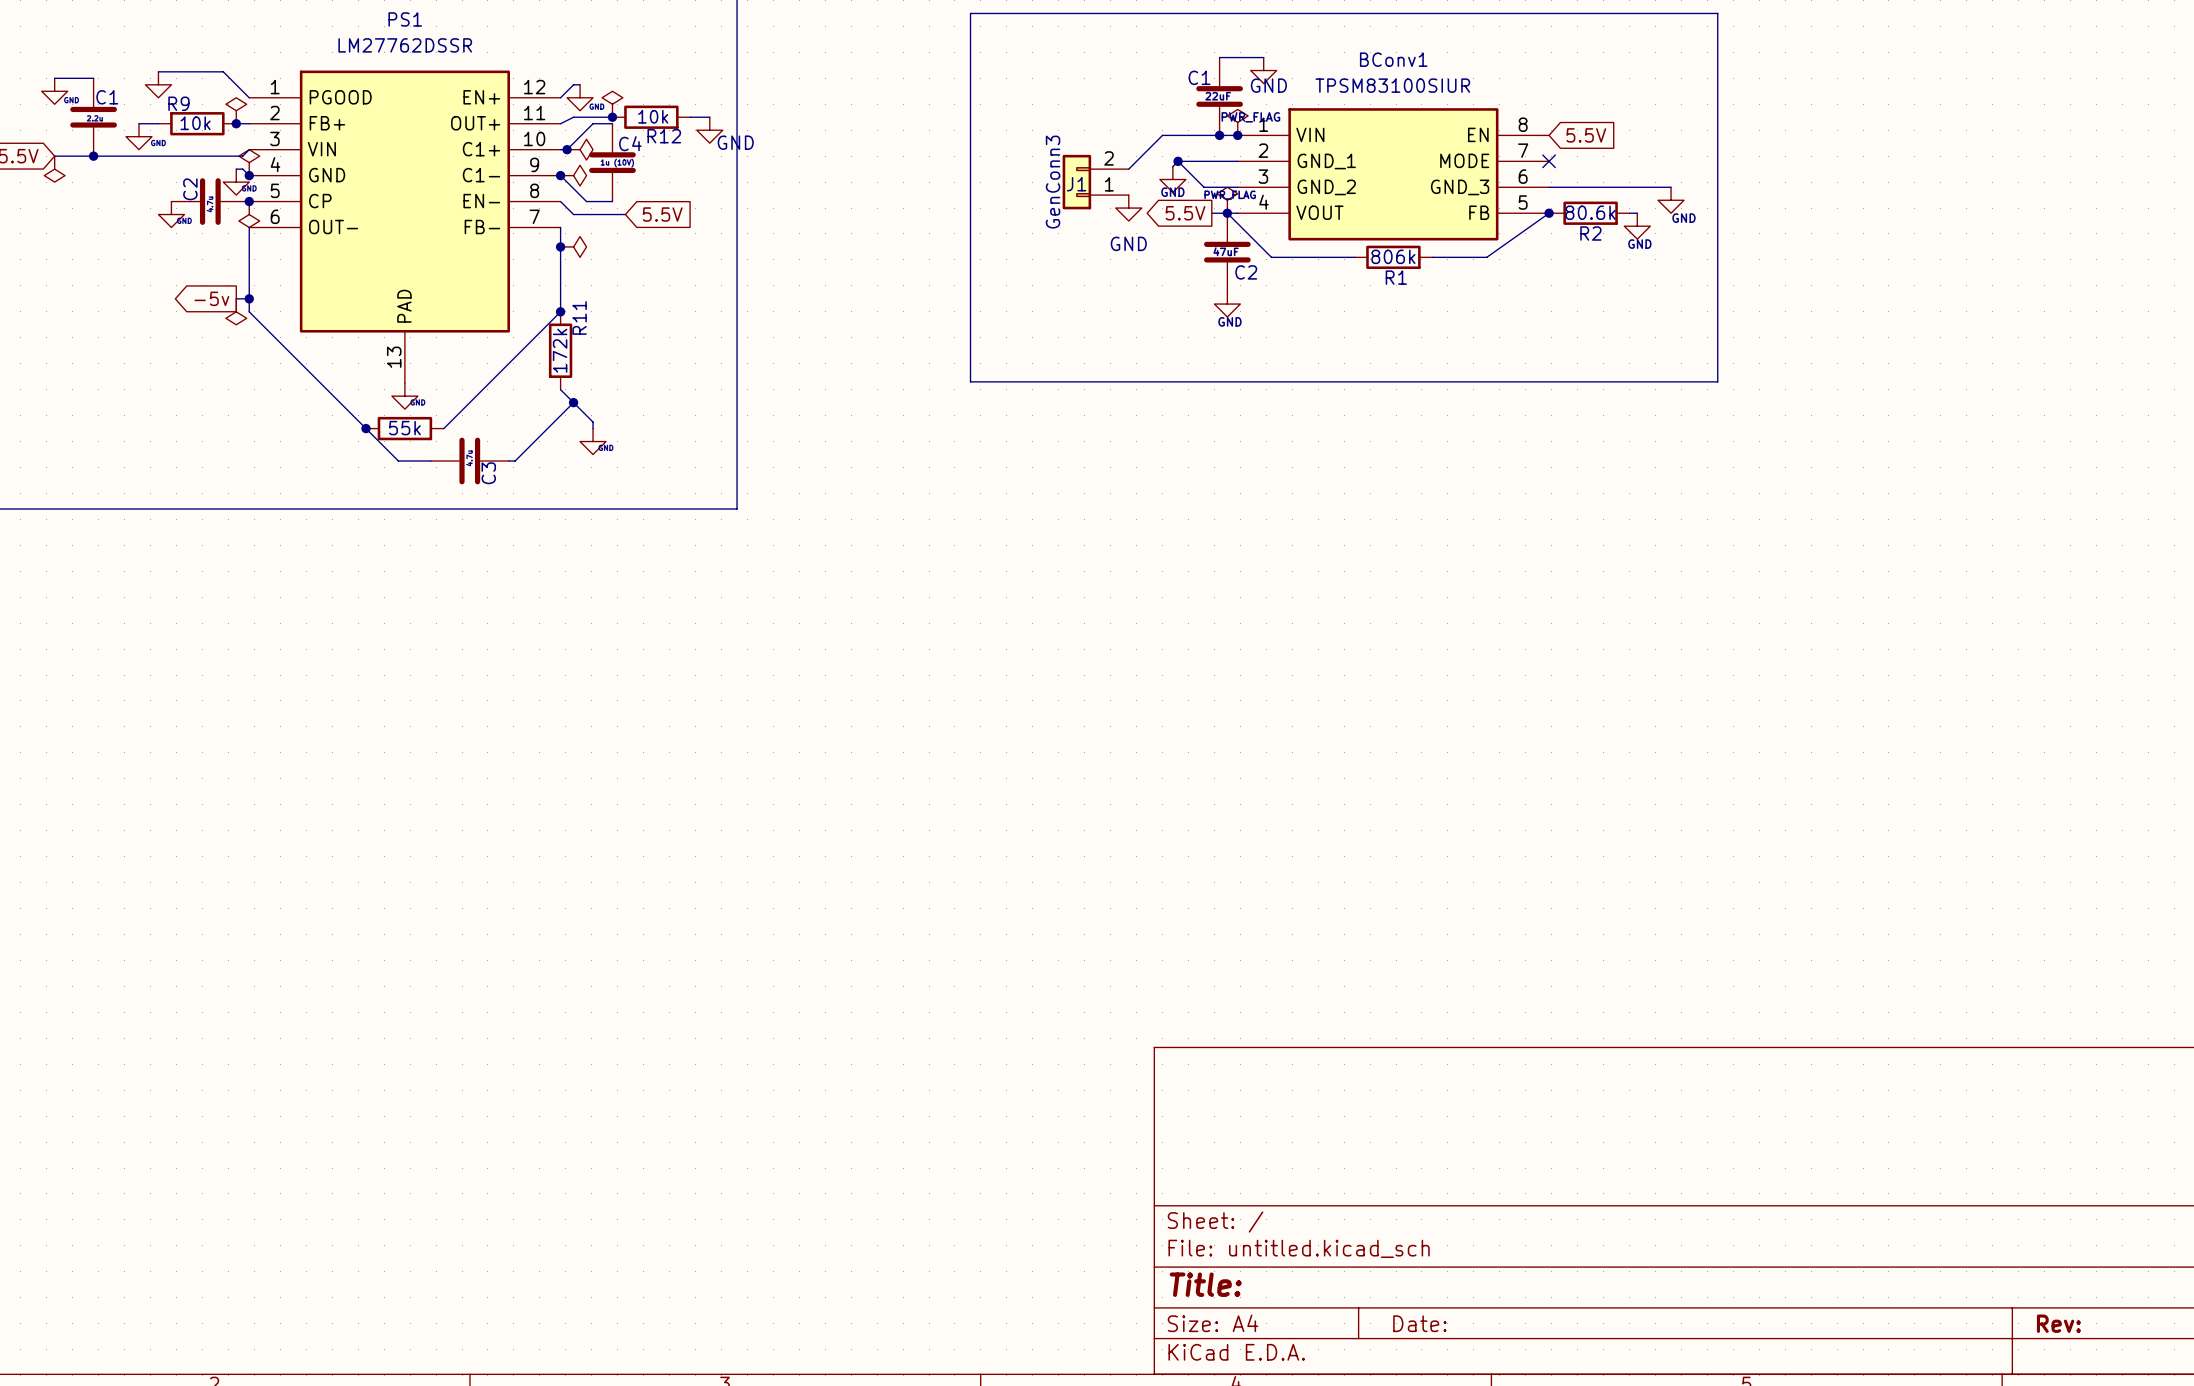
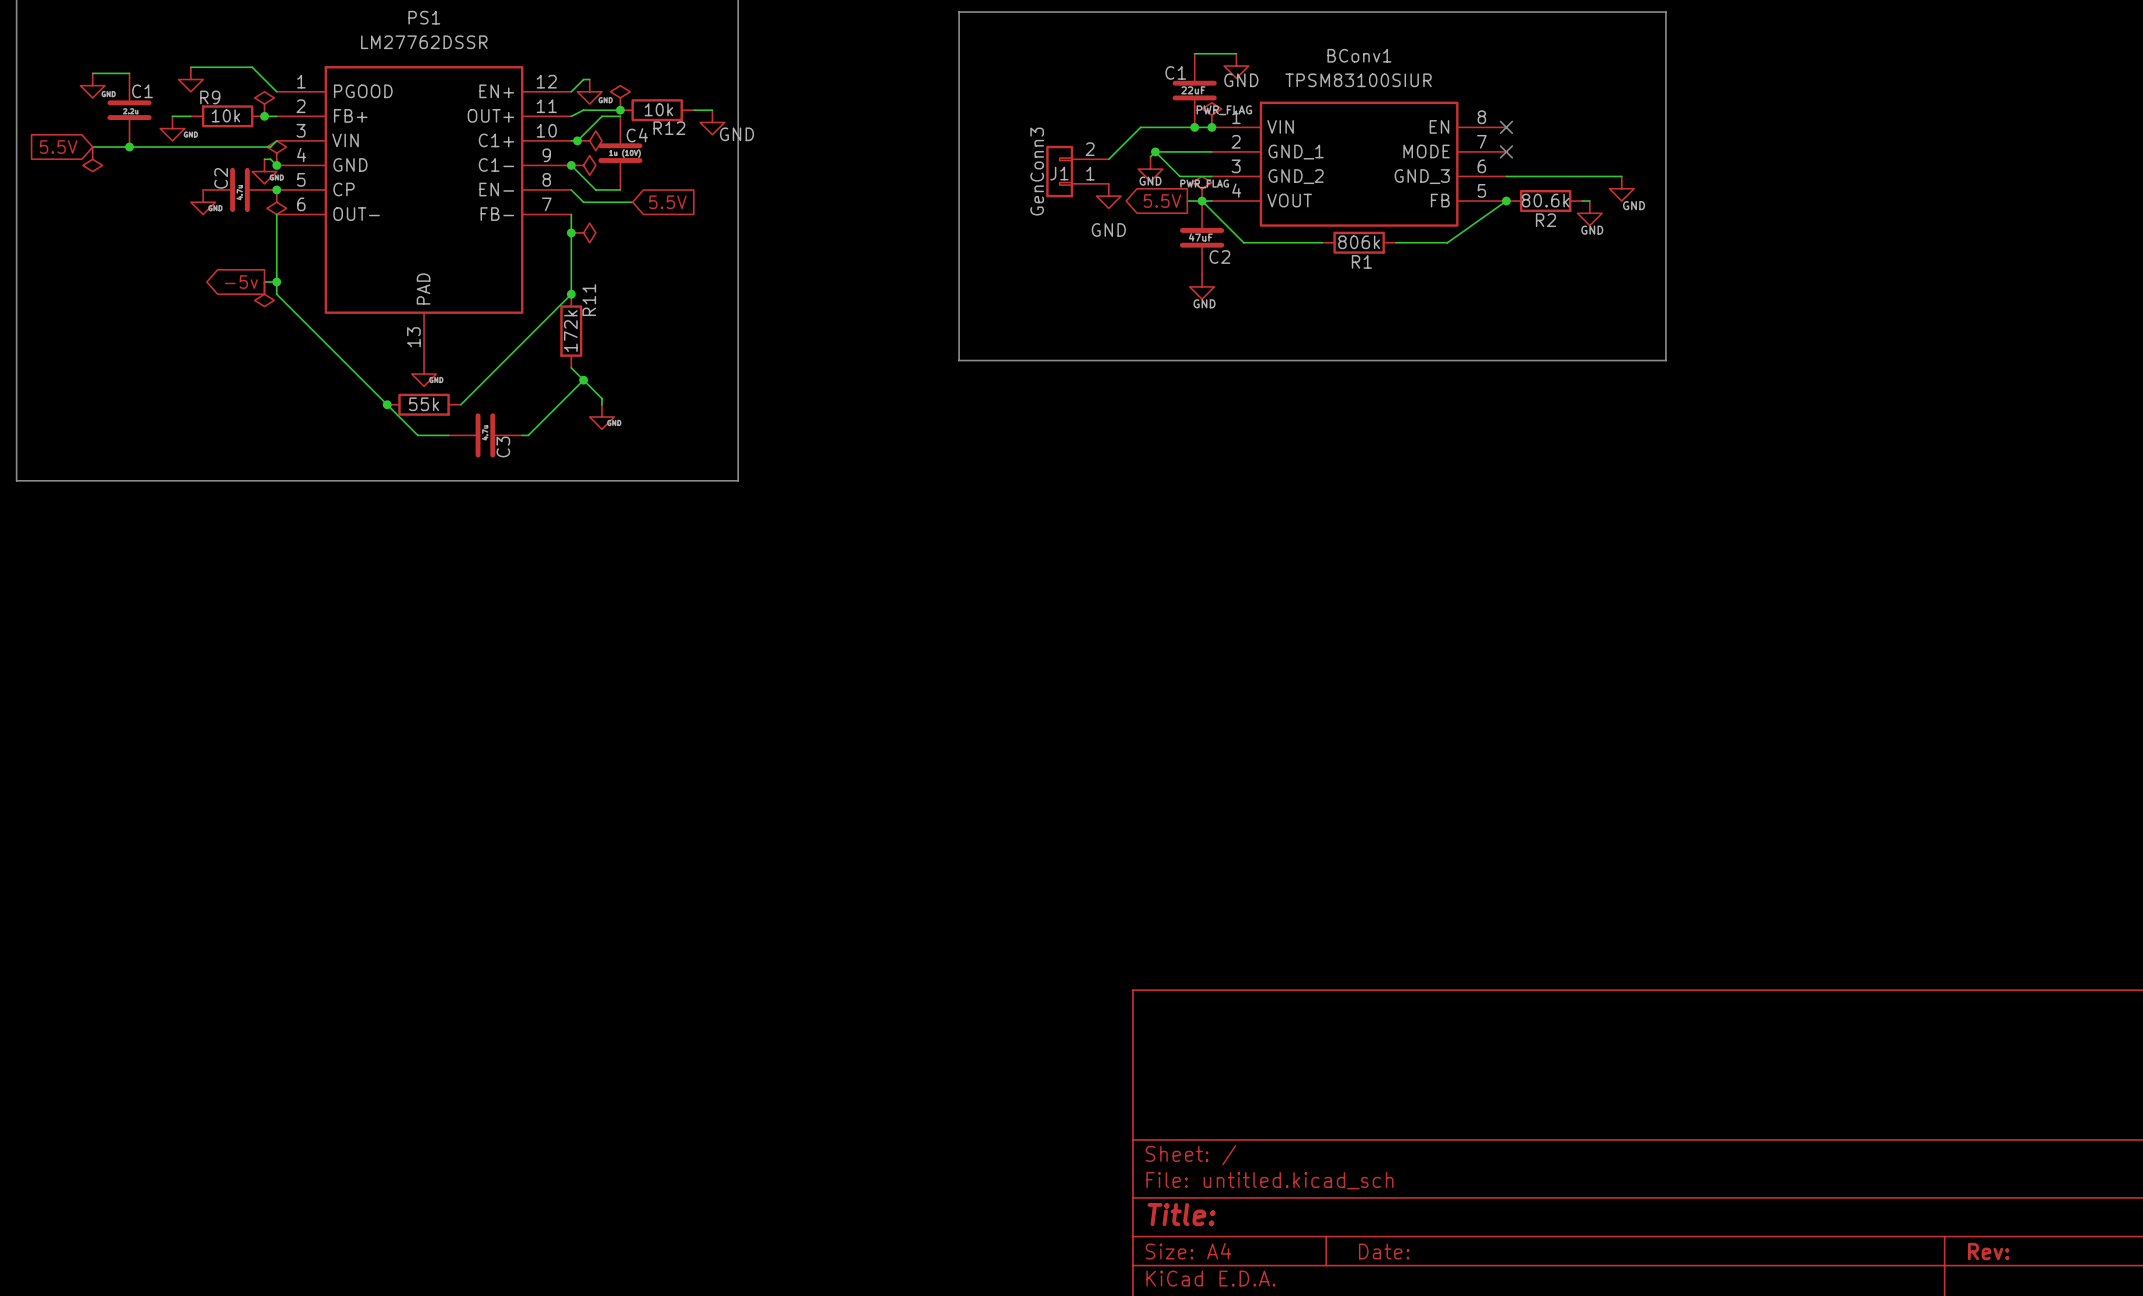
no-connect mark: none -> (1506, 127)
global label: 5.5V (1586, 135) -> none

